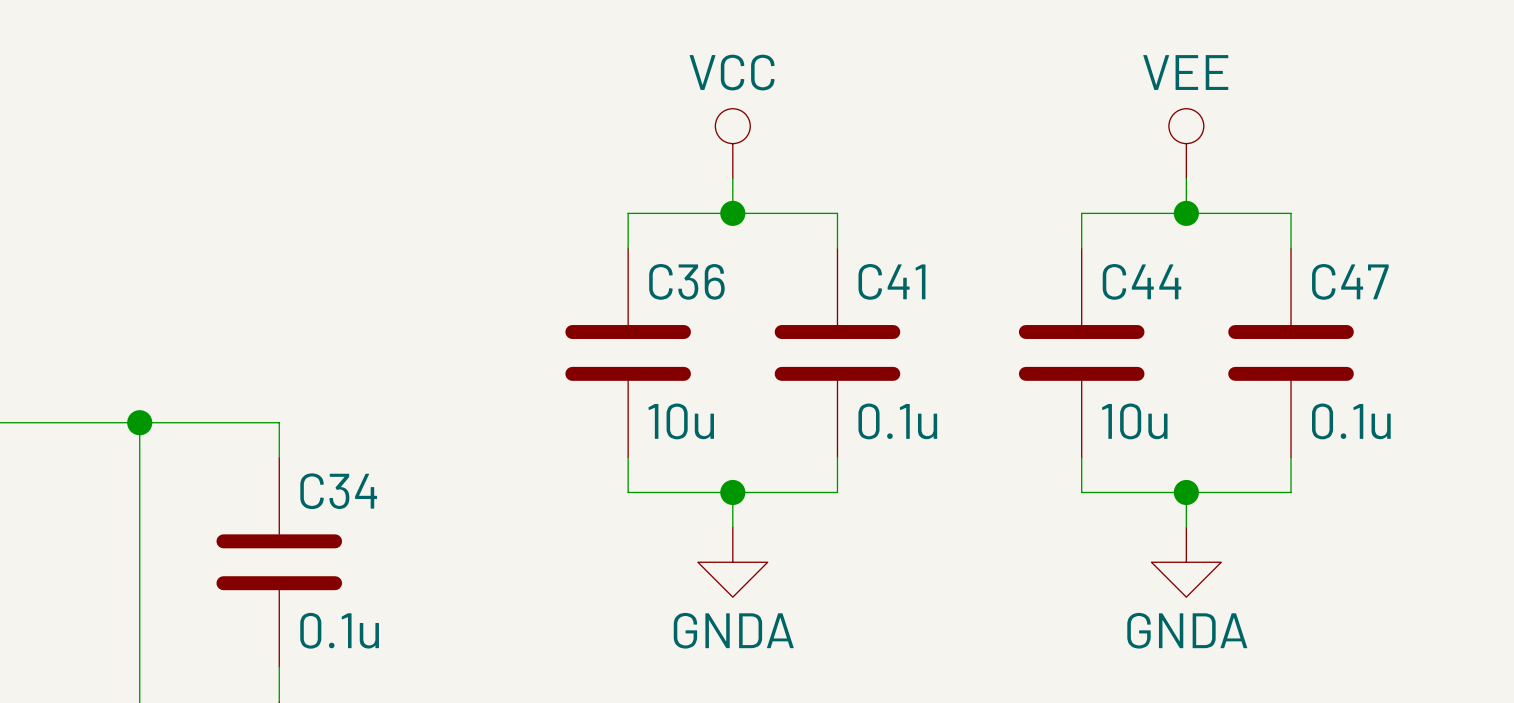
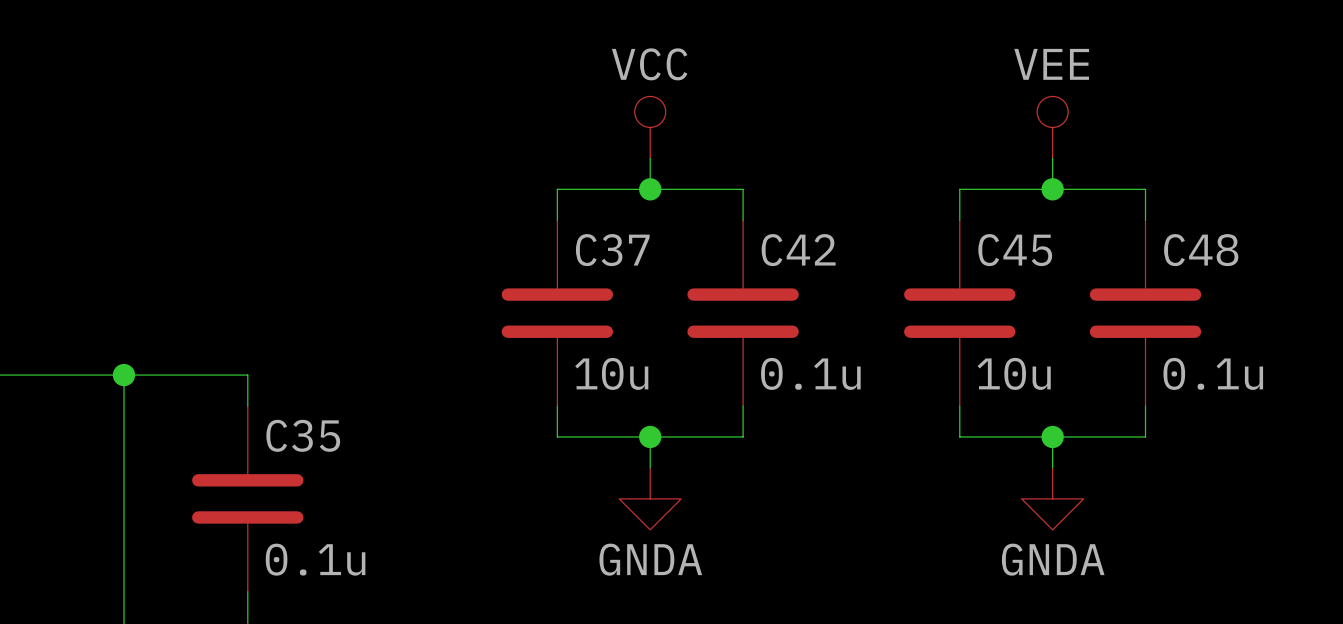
C36 name: C36 (686, 281) -> C37 (612, 250)
C41 name: C41 (891, 281) -> C42 (798, 250)
C44 name: C44 (1142, 281) -> C45 (1015, 250)
C47 name: C47 (1350, 281) -> C48 (1201, 250)
C34 name: C34 (338, 491) -> C35 (303, 435)

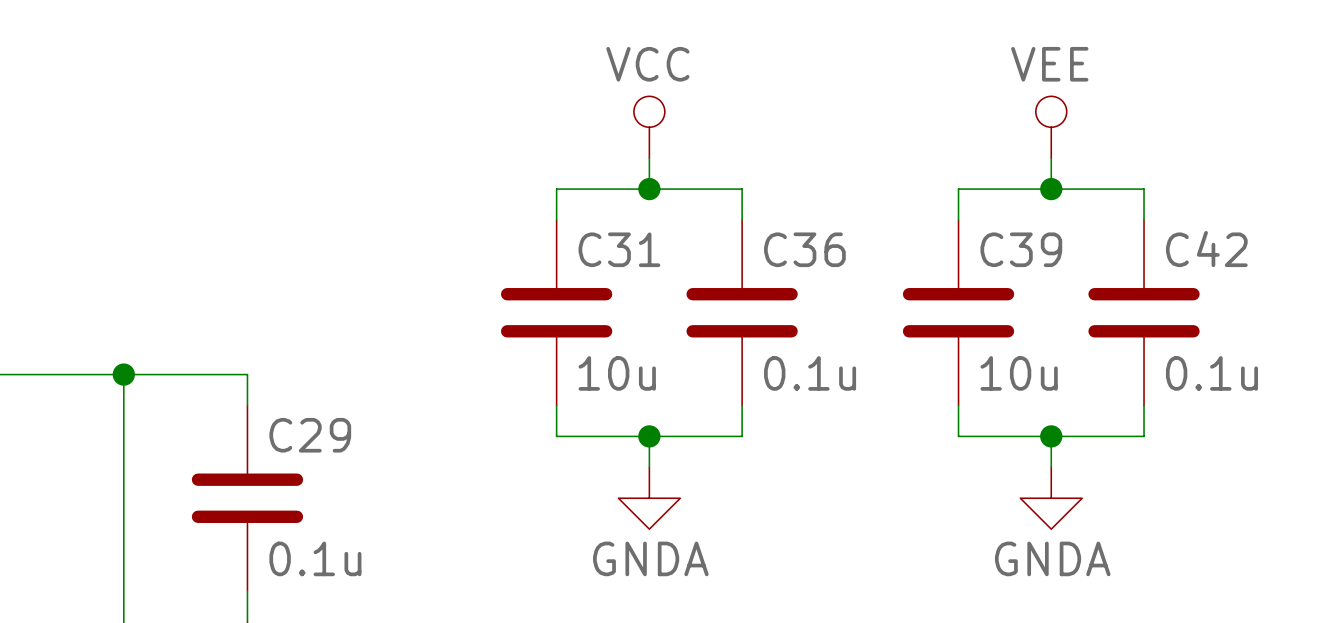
C37 name: C37 (612, 250) -> C31 (619, 249)
C42 name: C42 (798, 250) -> C36 (804, 249)
C45 name: C45 (1015, 250) -> C39 (1021, 249)
C48 name: C48 (1201, 250) -> C42 (1206, 249)
C35 name: C35 (303, 435) -> C29 (310, 435)

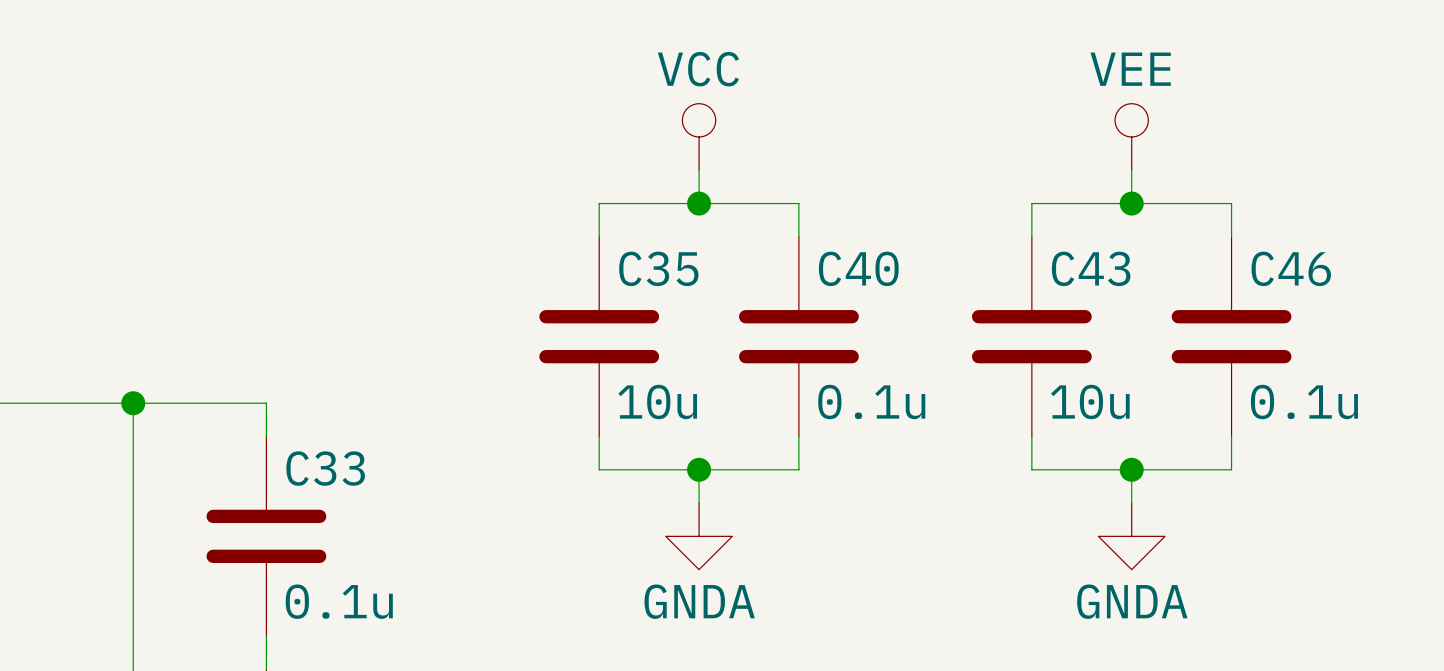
C31 name: C31 (619, 249) -> C35 (658, 268)
C36 name: C36 (804, 249) -> C40 (858, 268)
C39 name: C39 (1021, 249) -> C43 (1091, 268)
C42 name: C42 (1206, 249) -> C46 (1291, 268)
C29 name: C29 (310, 435) -> C33 (325, 468)

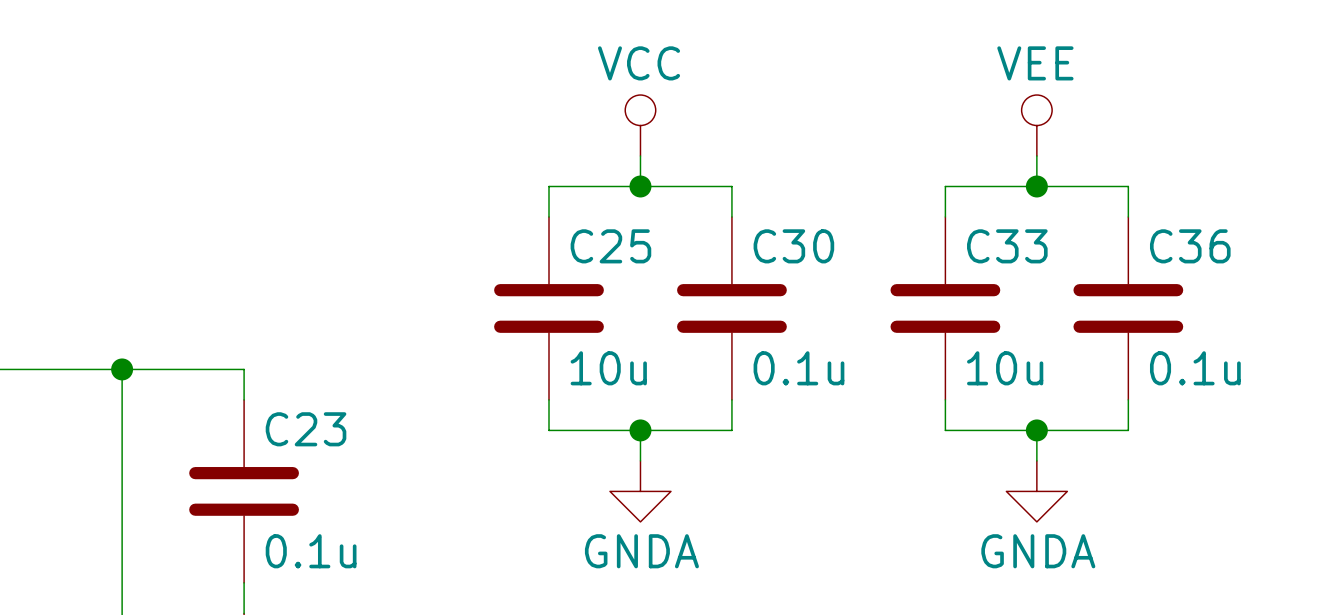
C35 name: C35 (658, 268) -> C25 (610, 246)
C40 name: C40 (858, 268) -> C30 (793, 246)
C43 name: C43 (1091, 268) -> C33 (1007, 246)
C46 name: C46 (1291, 268) -> C36 (1190, 246)
C33 name: C33 (325, 468) -> C23 (306, 429)

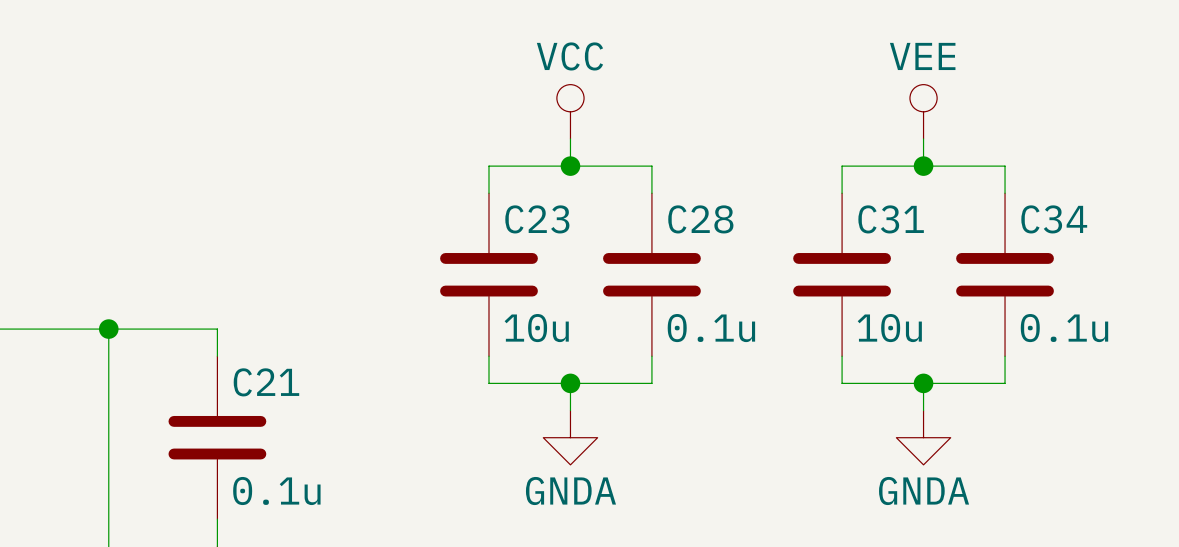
C25 name: C25 (610, 246) -> C23 (537, 219)
C30 name: C30 (793, 246) -> C28 (700, 219)
C33 name: C33 (1007, 246) -> C31 (891, 219)
C36 name: C36 (1190, 246) -> C34 (1054, 219)
C23 name: C23 (306, 429) -> C21 (266, 382)

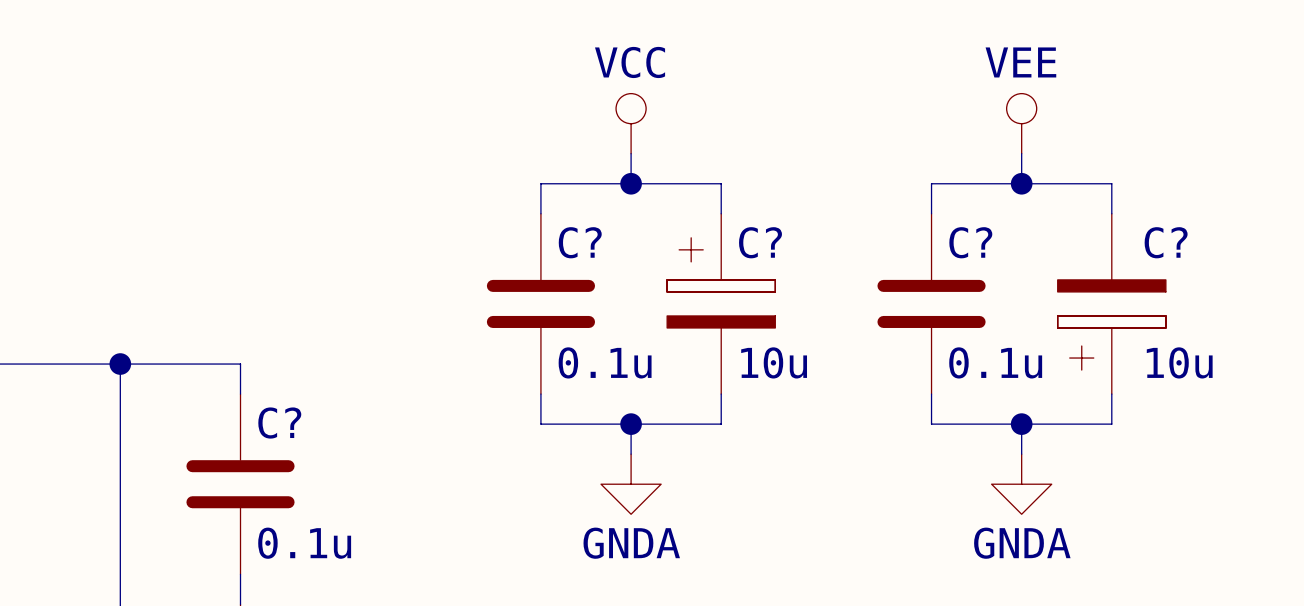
C23 name: C23 (537, 219) -> C? (580, 242)
C31 name: C31 (891, 219) -> C? (970, 242)
C28: 0.1u (651, 274) -> none
C?: none -> 10u (721, 303)
C34: 0.1u (1005, 274) -> none
C?: none -> 10u (1111, 303)
C23 value: 10u (536, 328) -> 0.1u (605, 362)
C31 value: 10u (889, 328) -> 0.1u (995, 362)
C21 name: C21 (266, 382) -> C? (279, 423)

